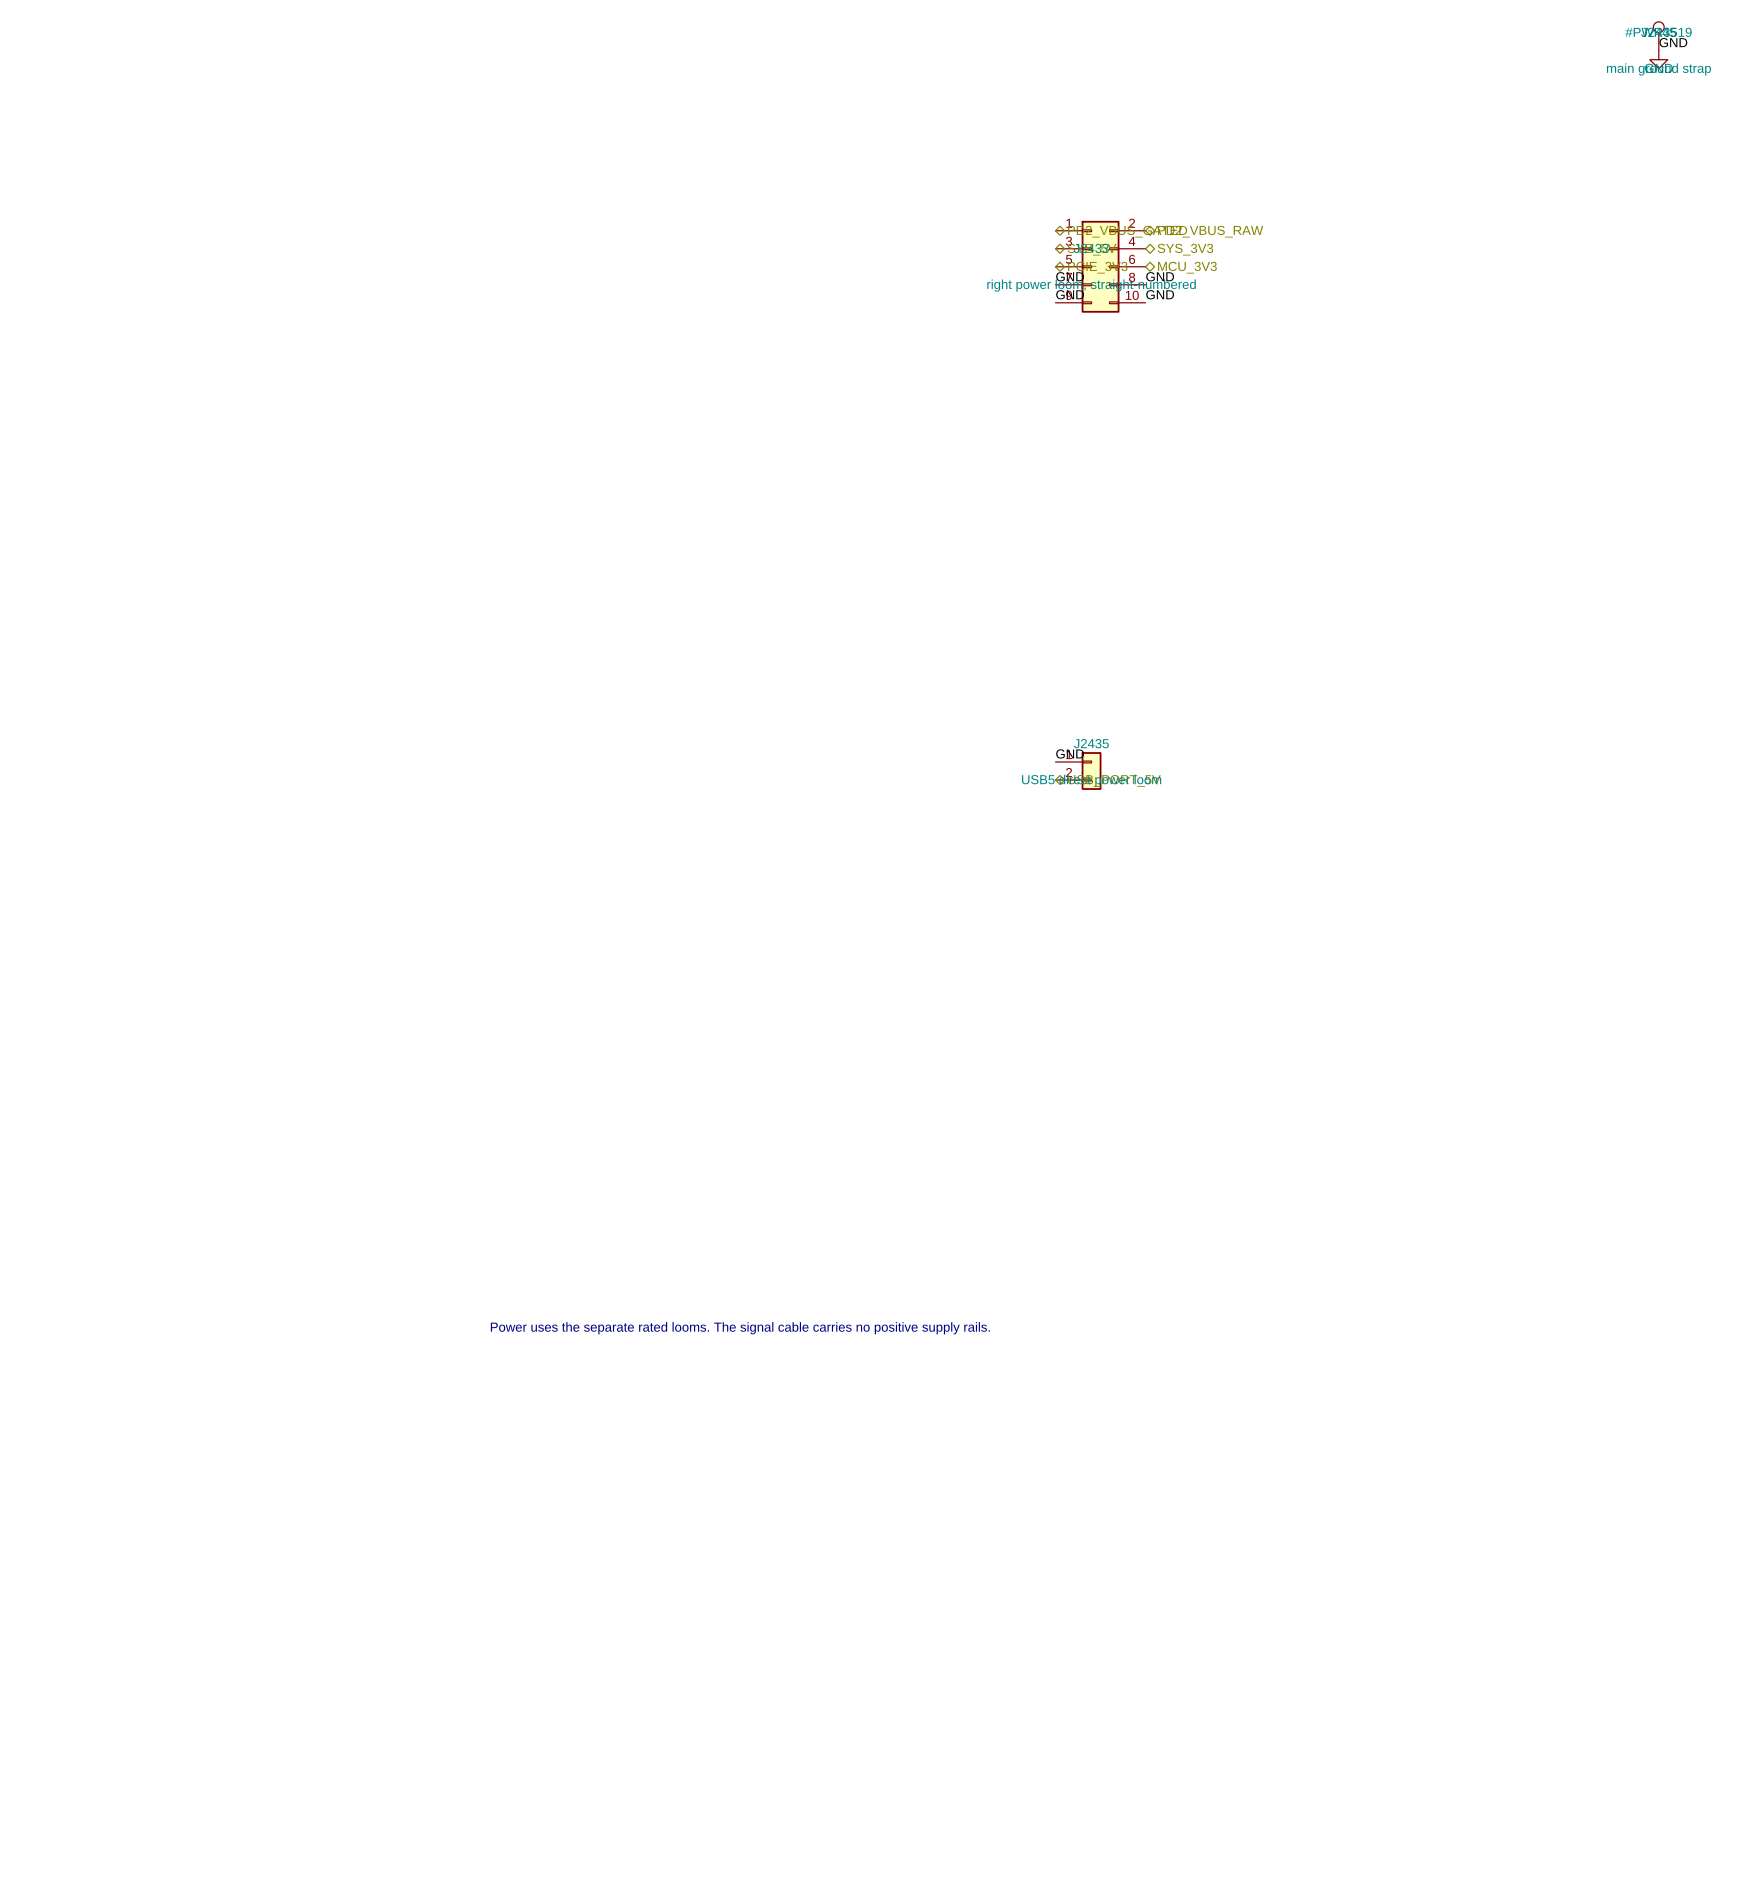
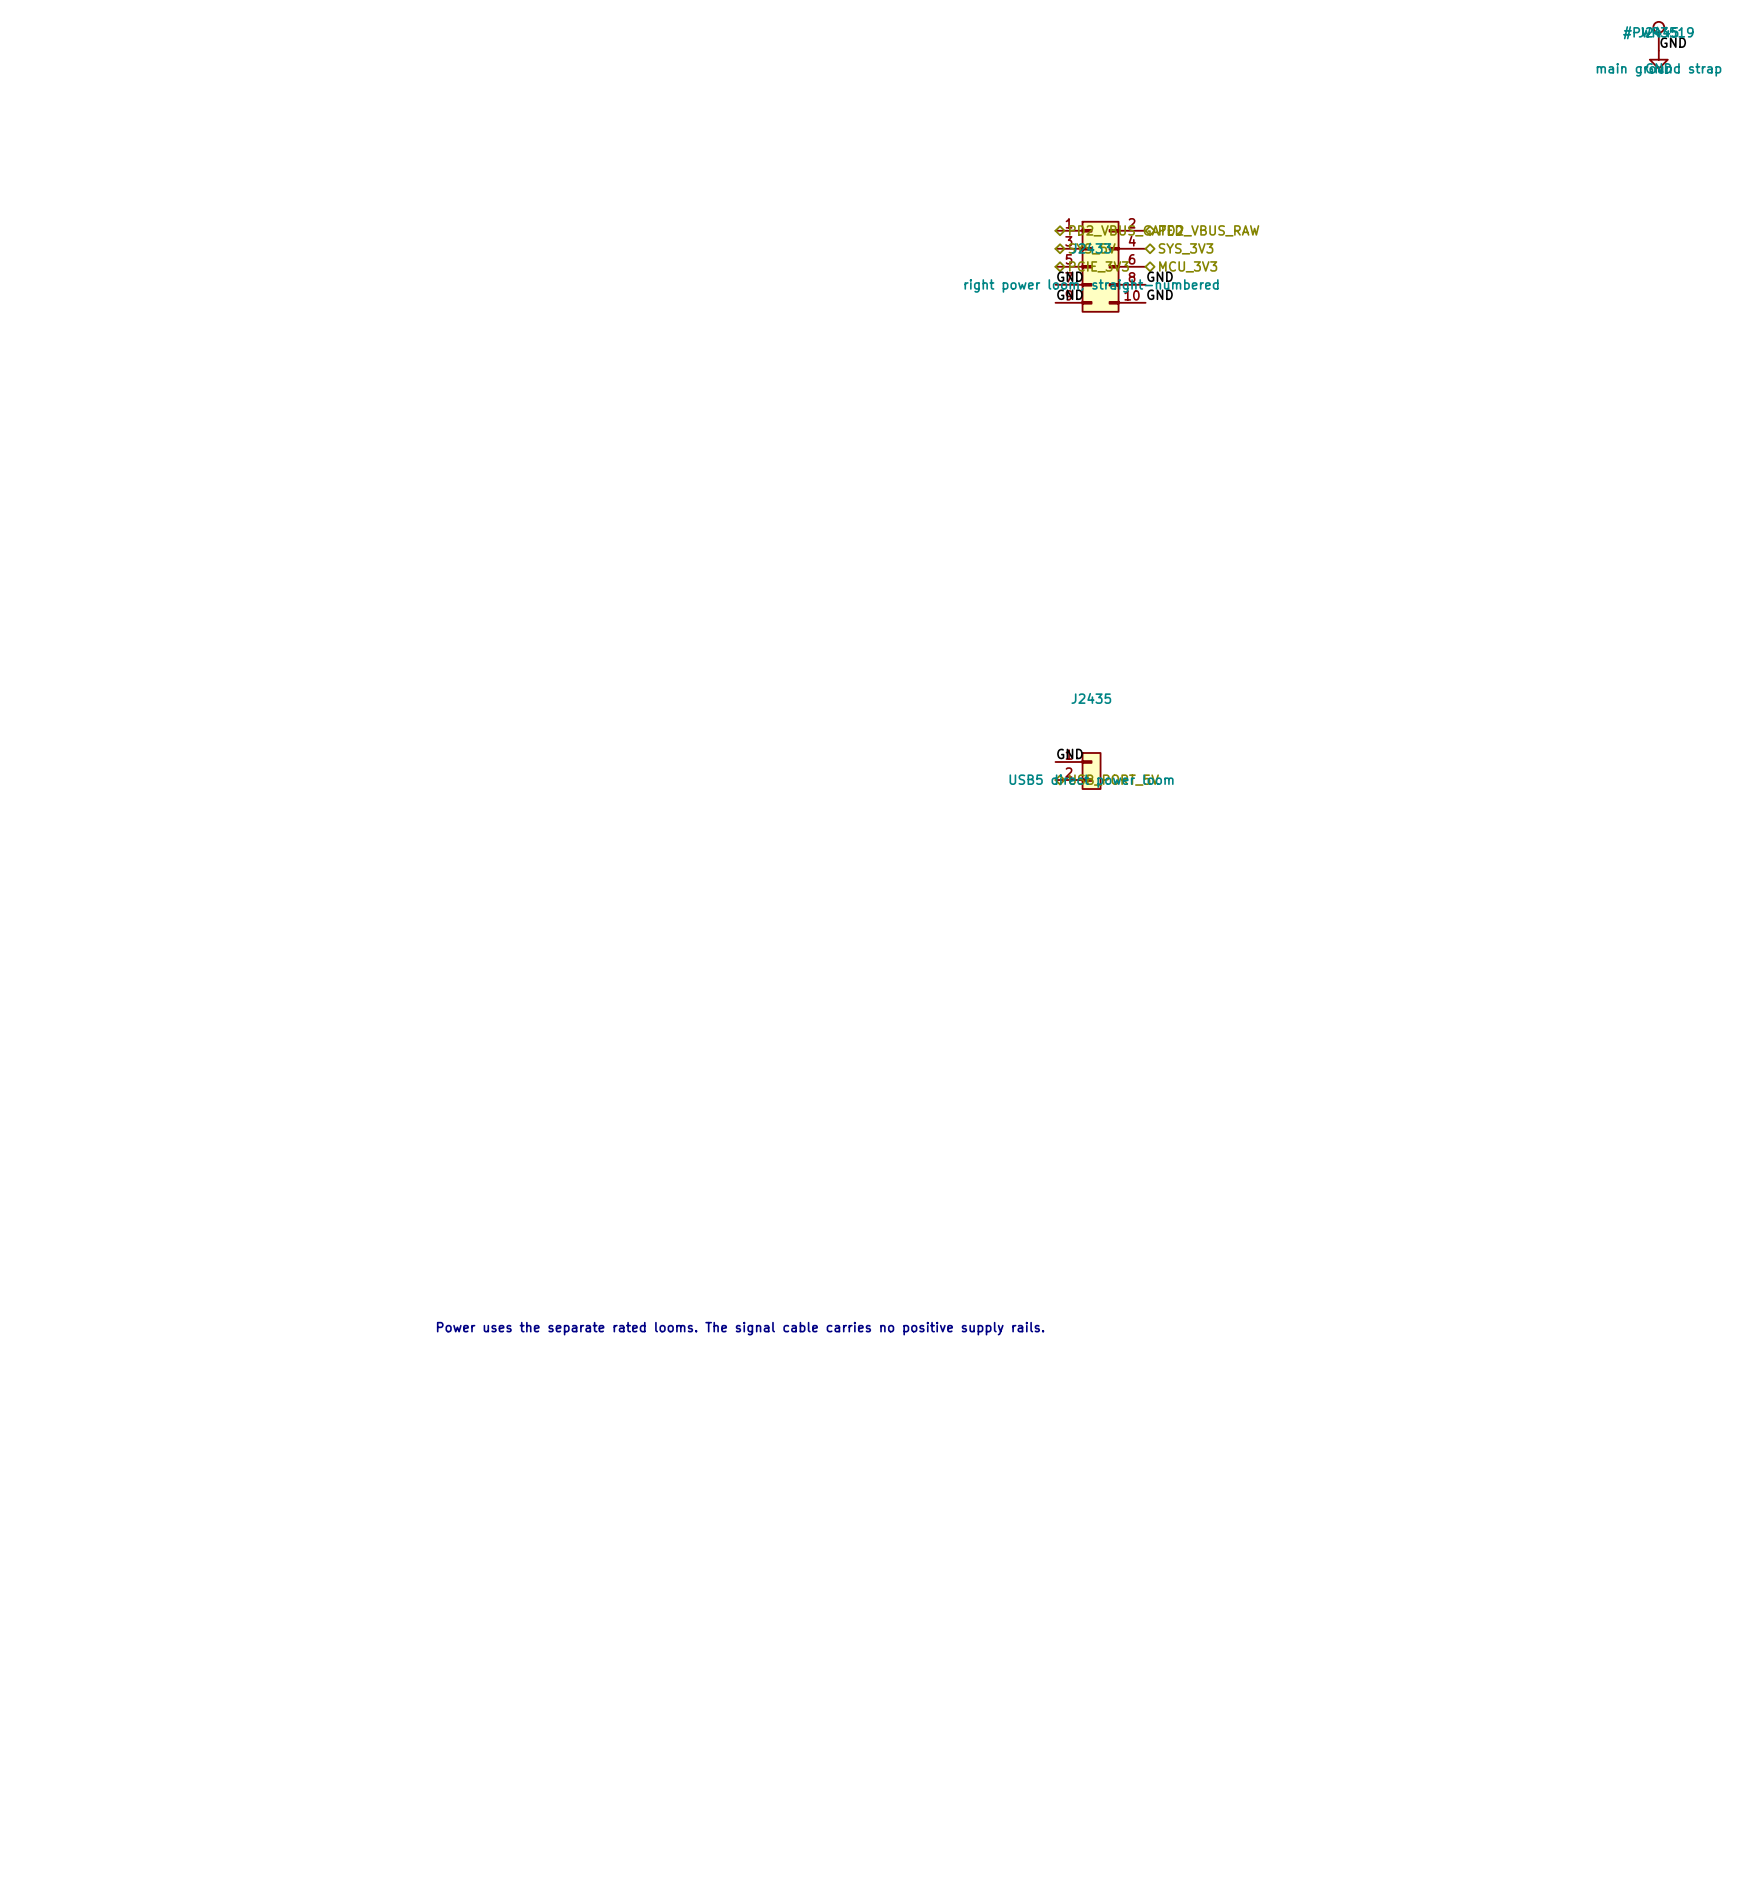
J2435 name position: J2435 (1091, 743) -> J2435 (1091, 698)

